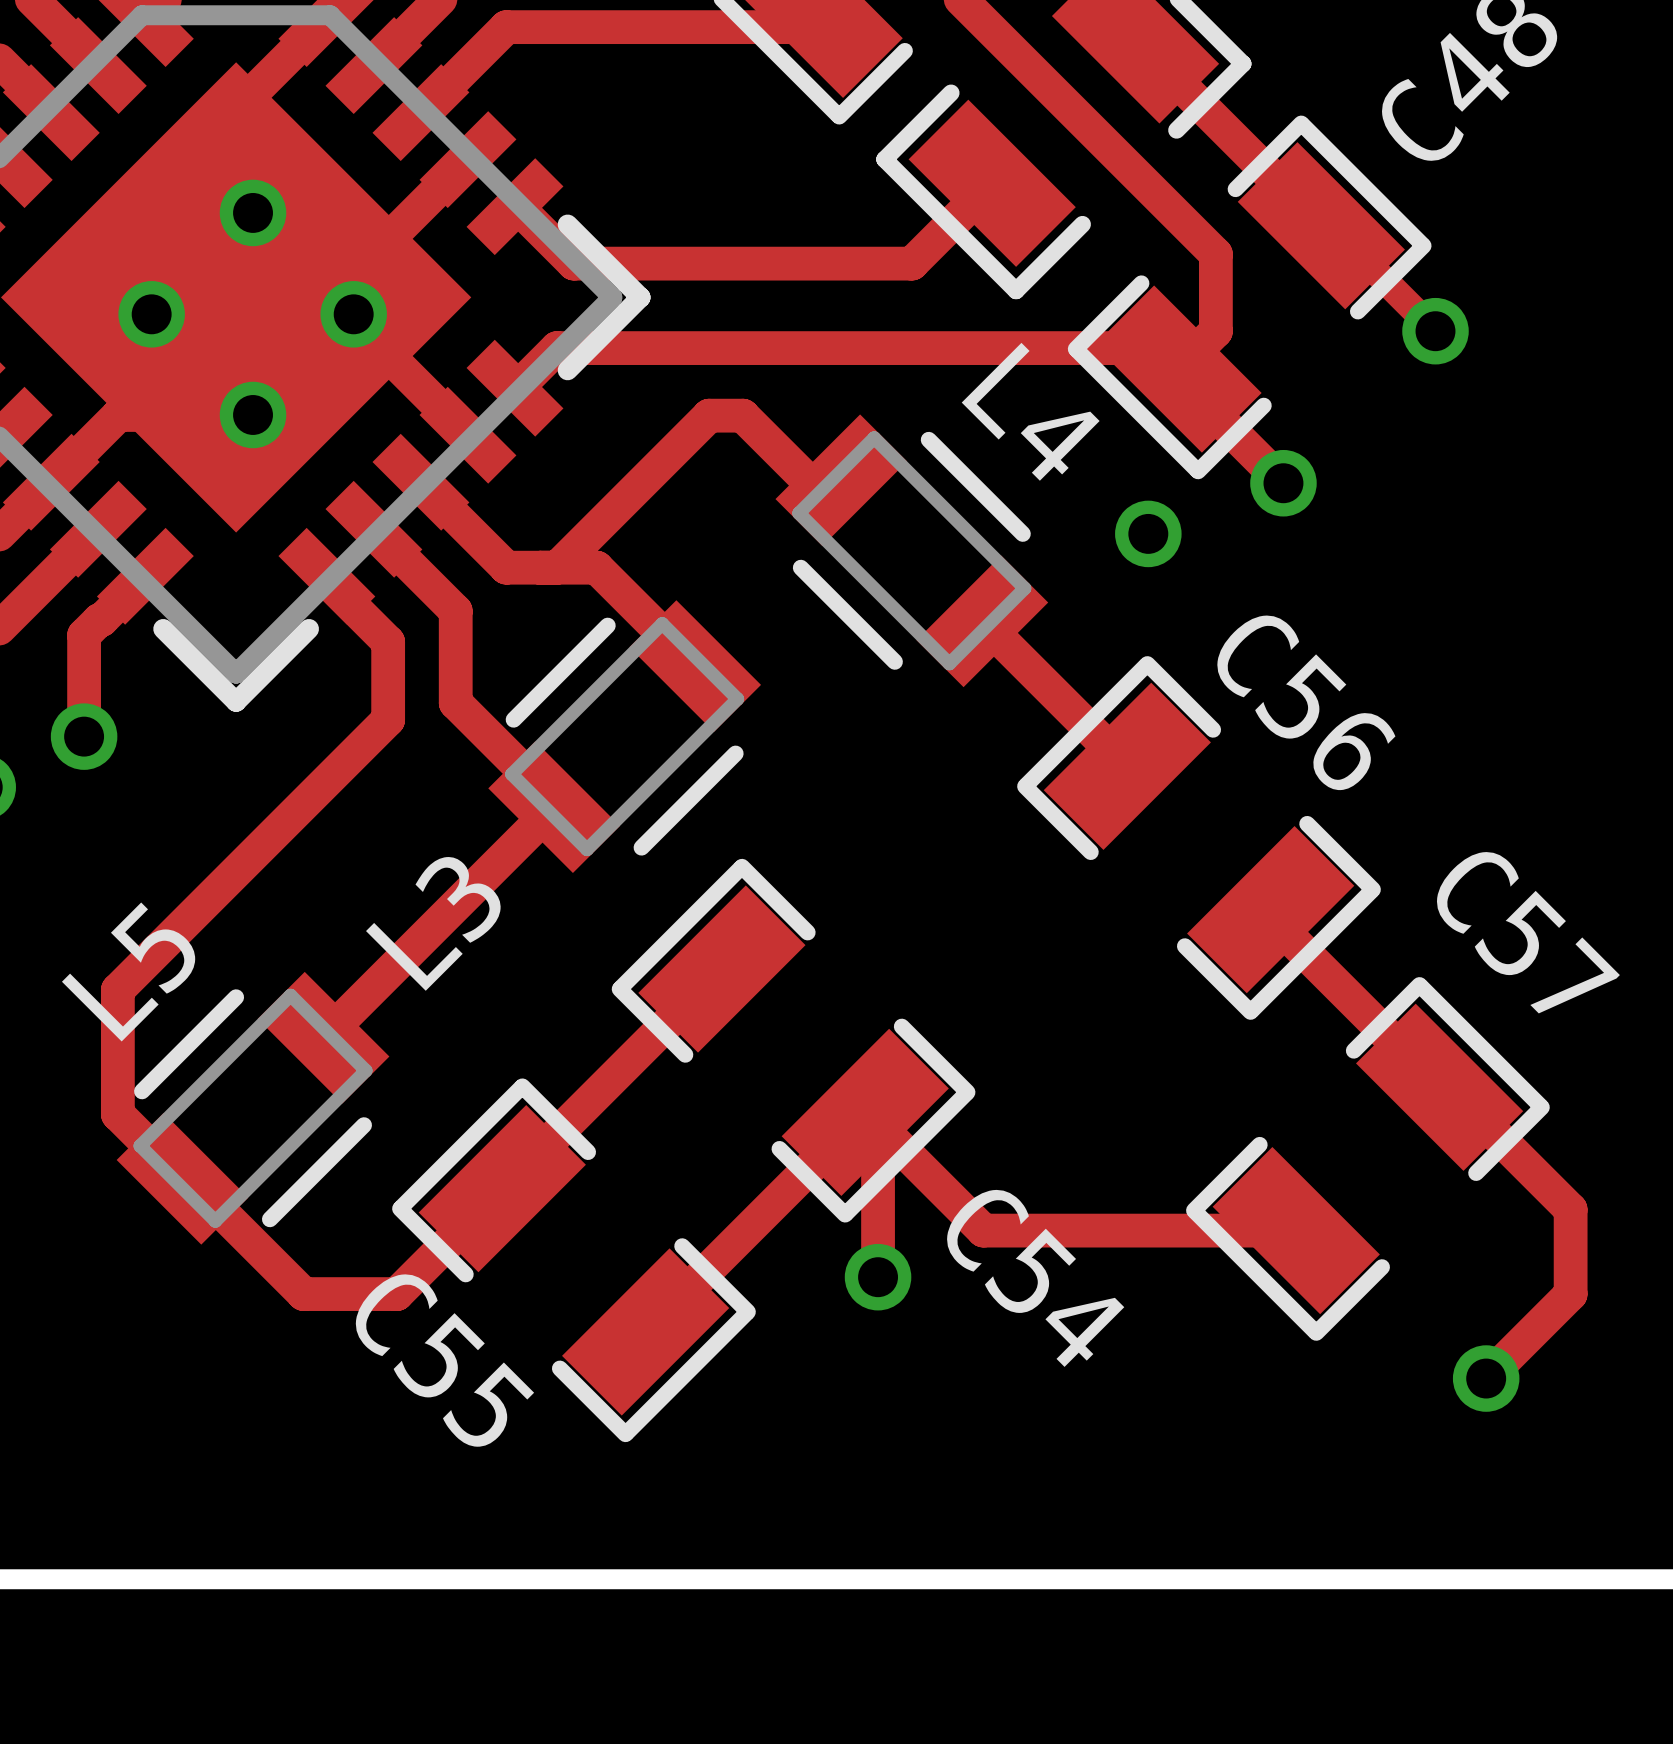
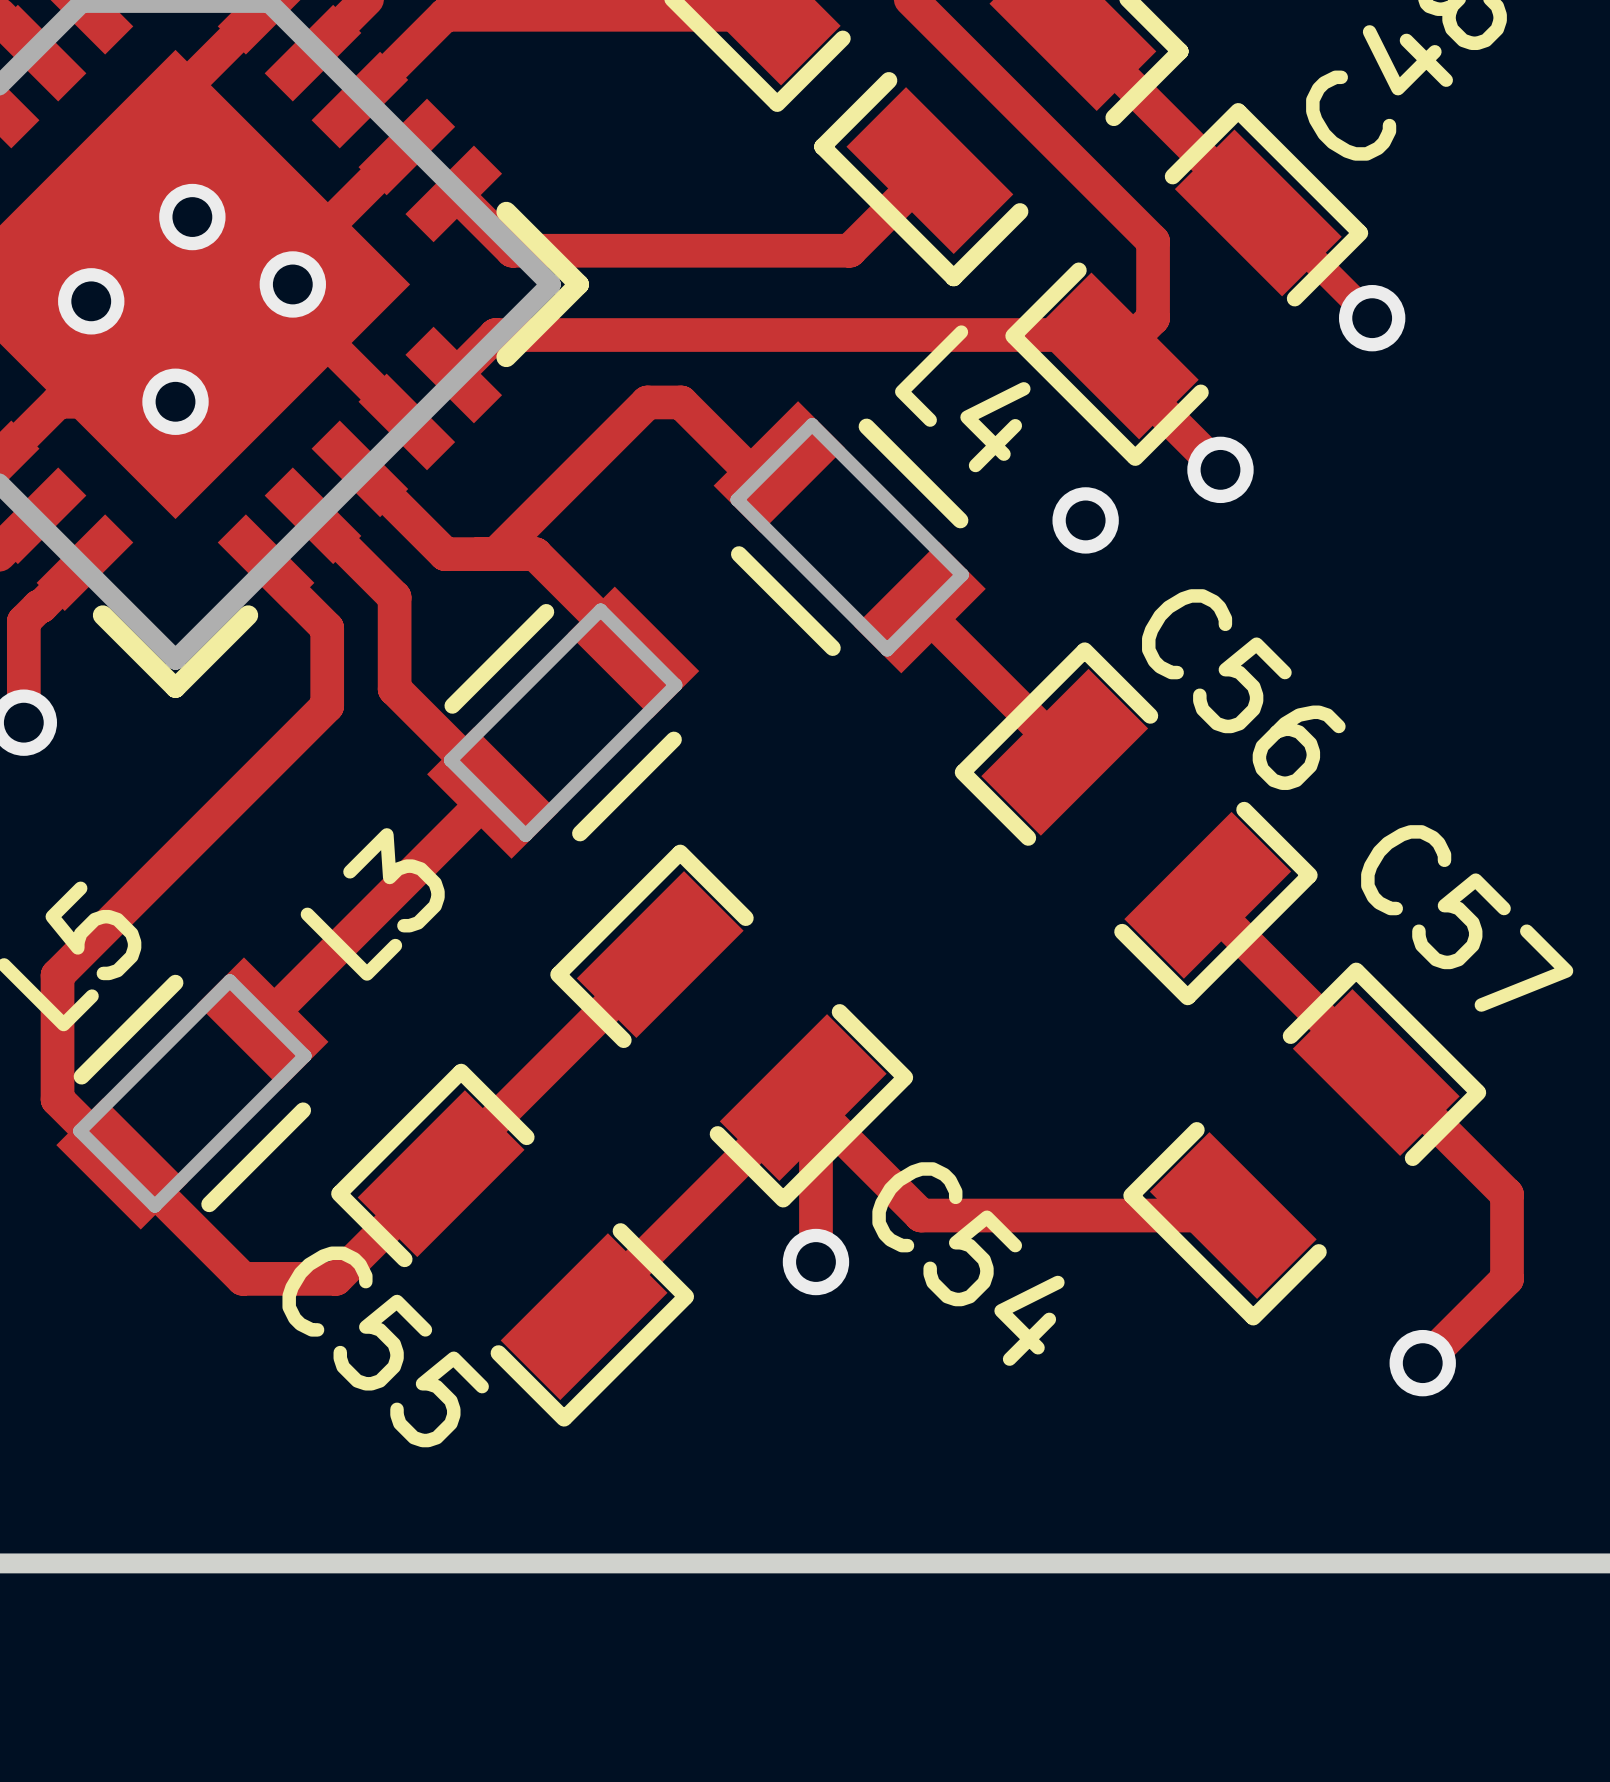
via position: (253, 212) -> (192, 217)
via position: (353, 314) -> (292, 284)
via position: (253, 414) -> (175, 401)

